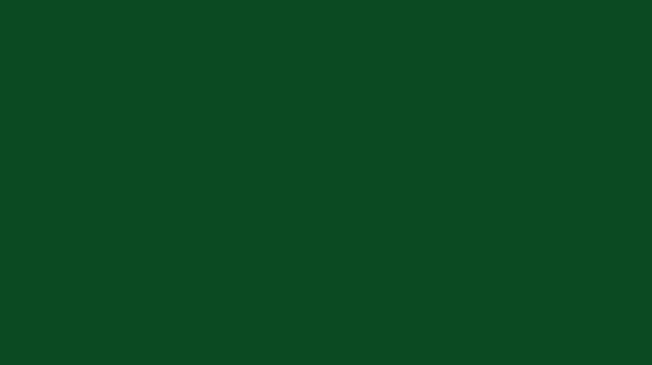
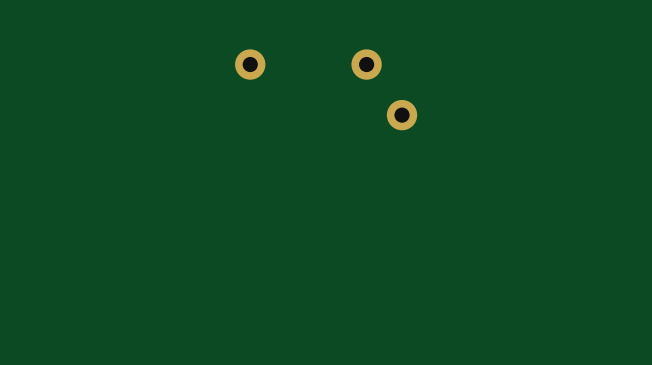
via: none -> (250, 64)
via: none -> (366, 64)
via: none -> (402, 115)

